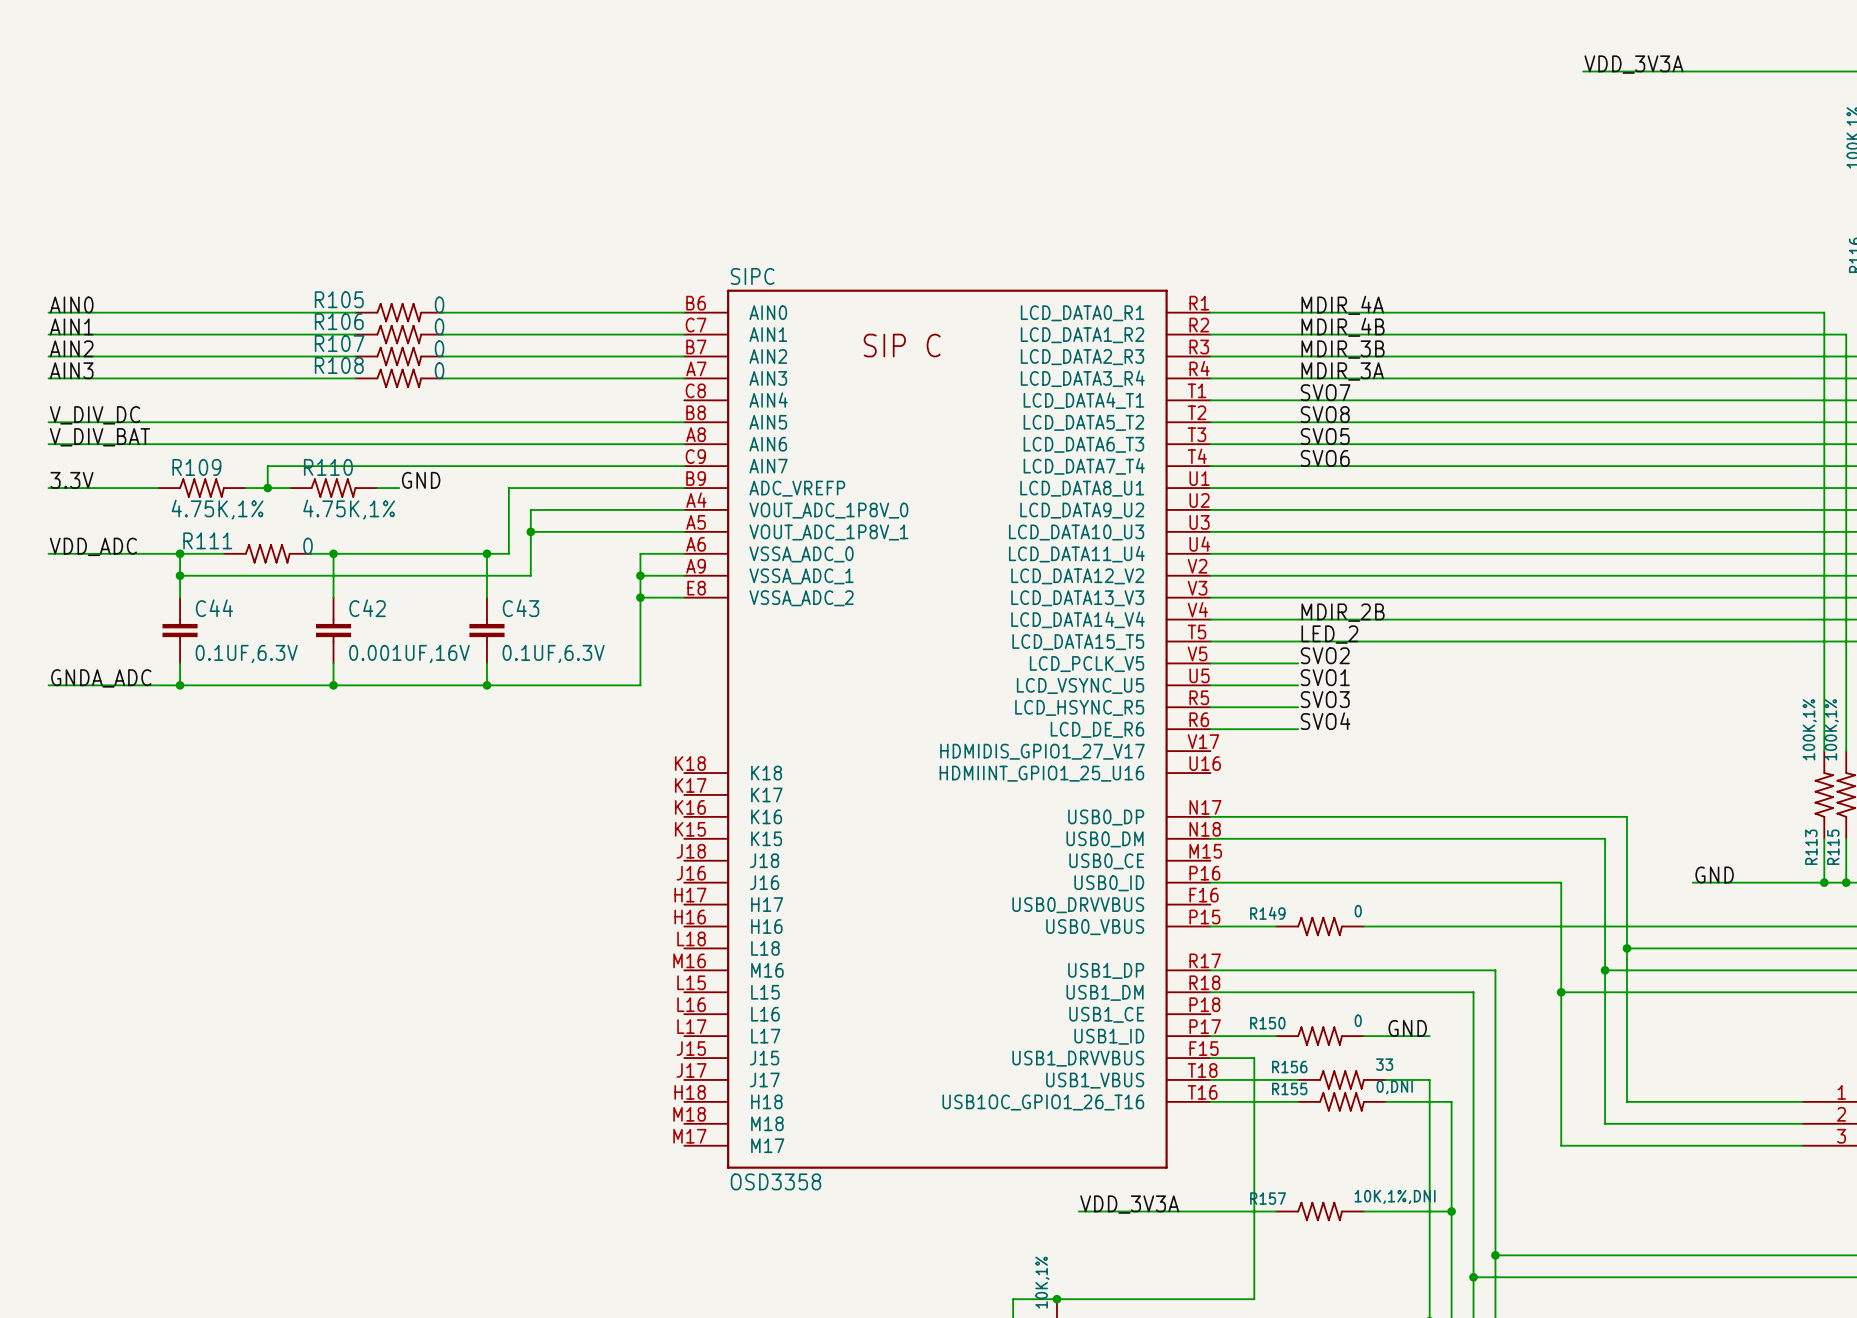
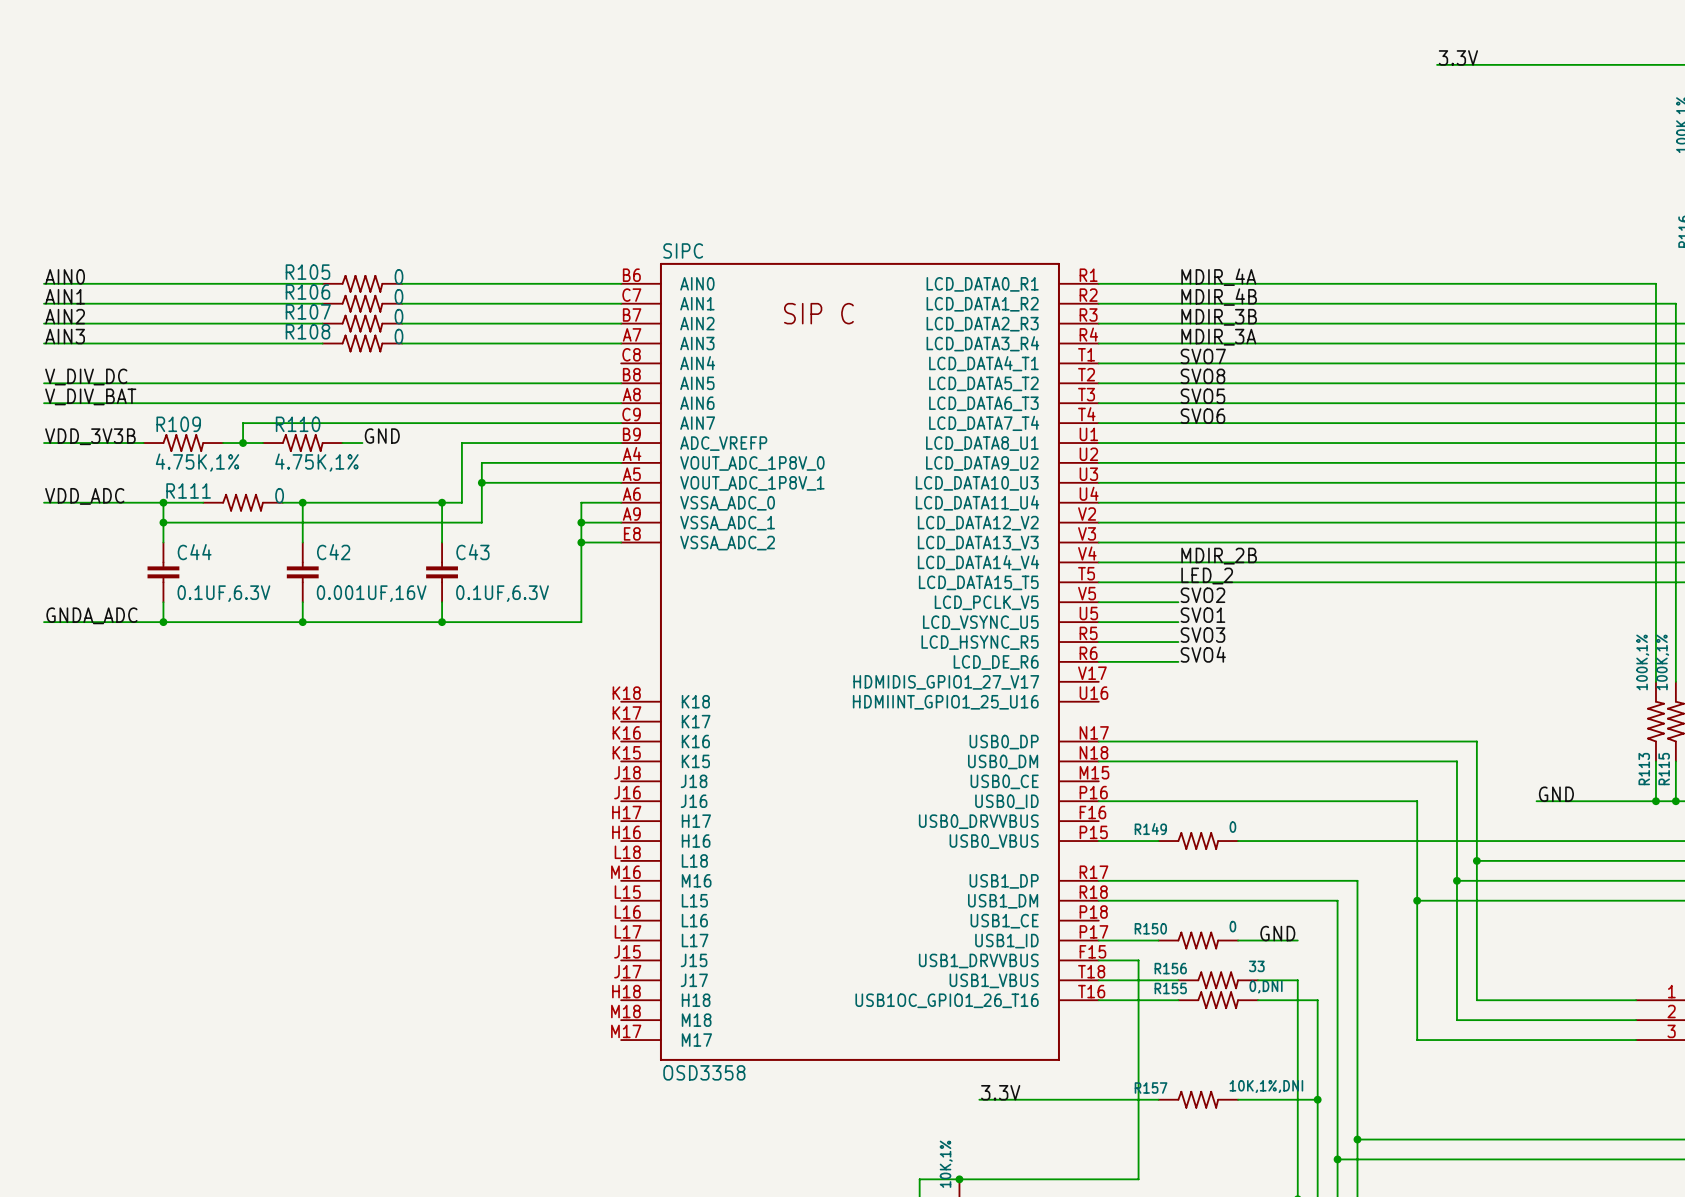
label: VDD_3V3A (1633, 64) -> 3.3V (1458, 57)
label: 3.3V (72, 480) -> VDD_3V3B (90, 436)
label: VDD_3V3A (1129, 1204) -> 3.3V (1000, 1092)

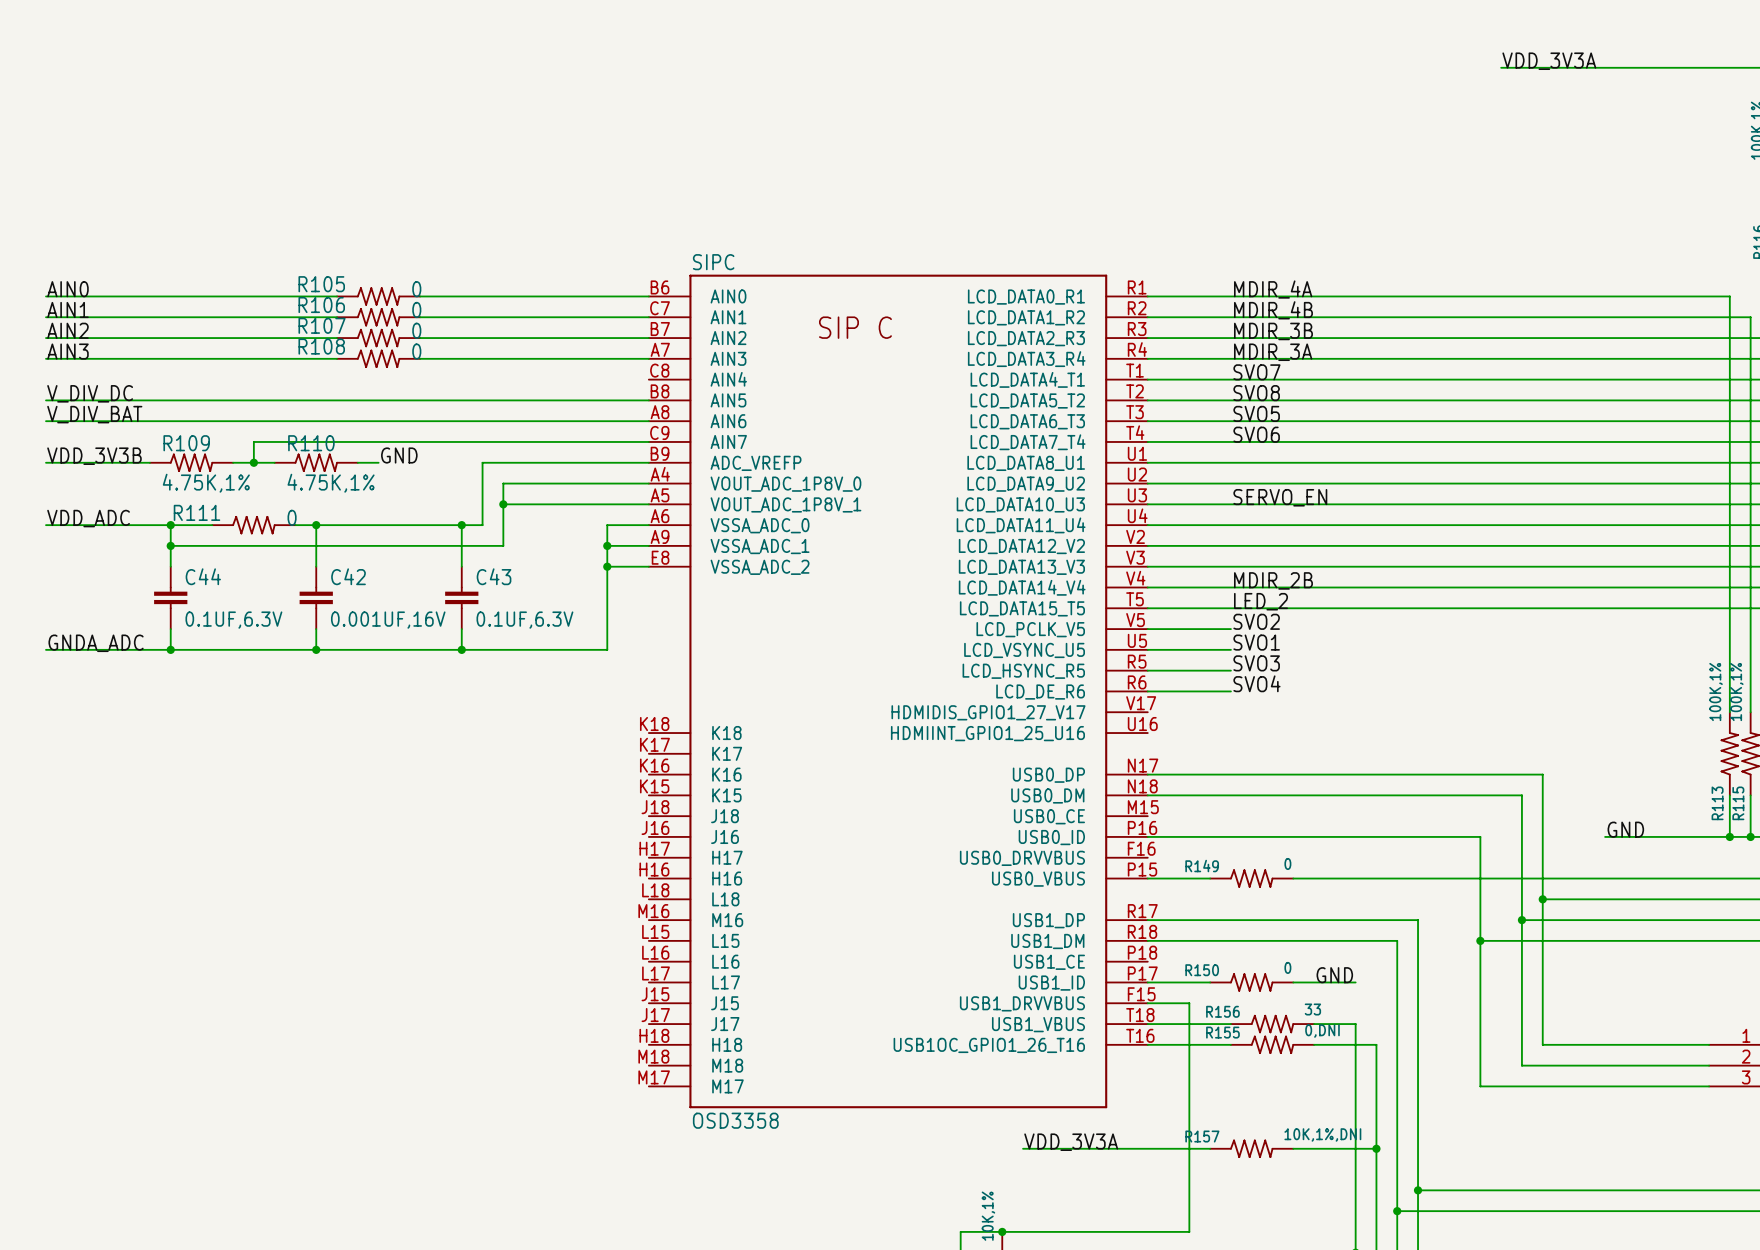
label: 3.3V (1458, 57) -> VDD_3V3A (1549, 61)
label: none -> SERVO_EN (1280, 497)
label: 3.3V (1000, 1092) -> VDD_3V3A (1071, 1142)

